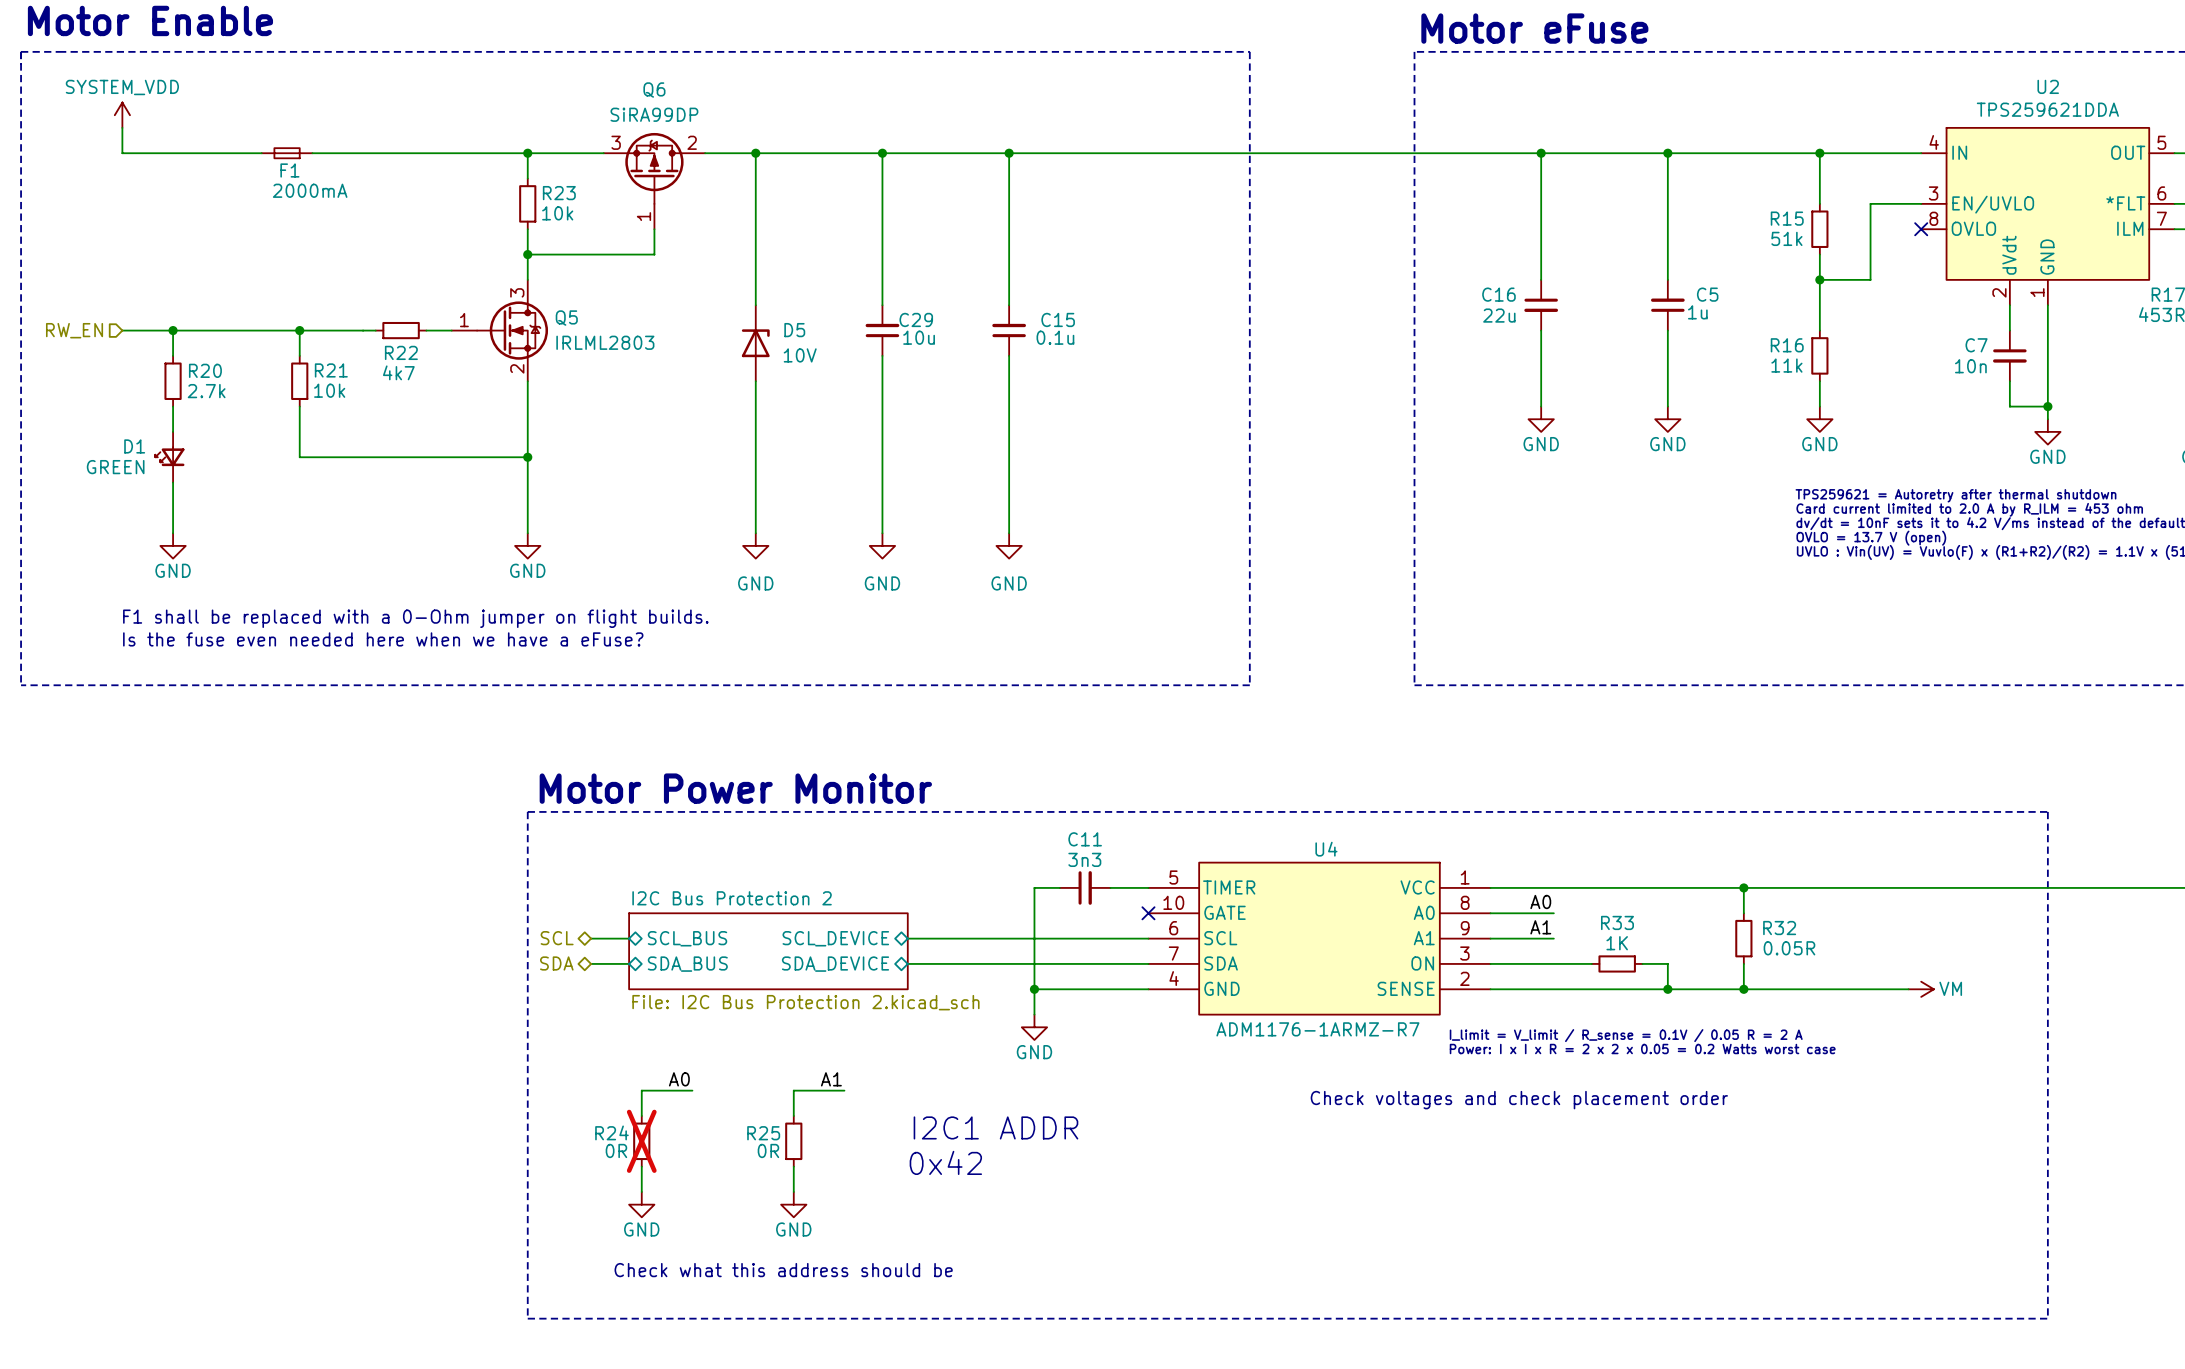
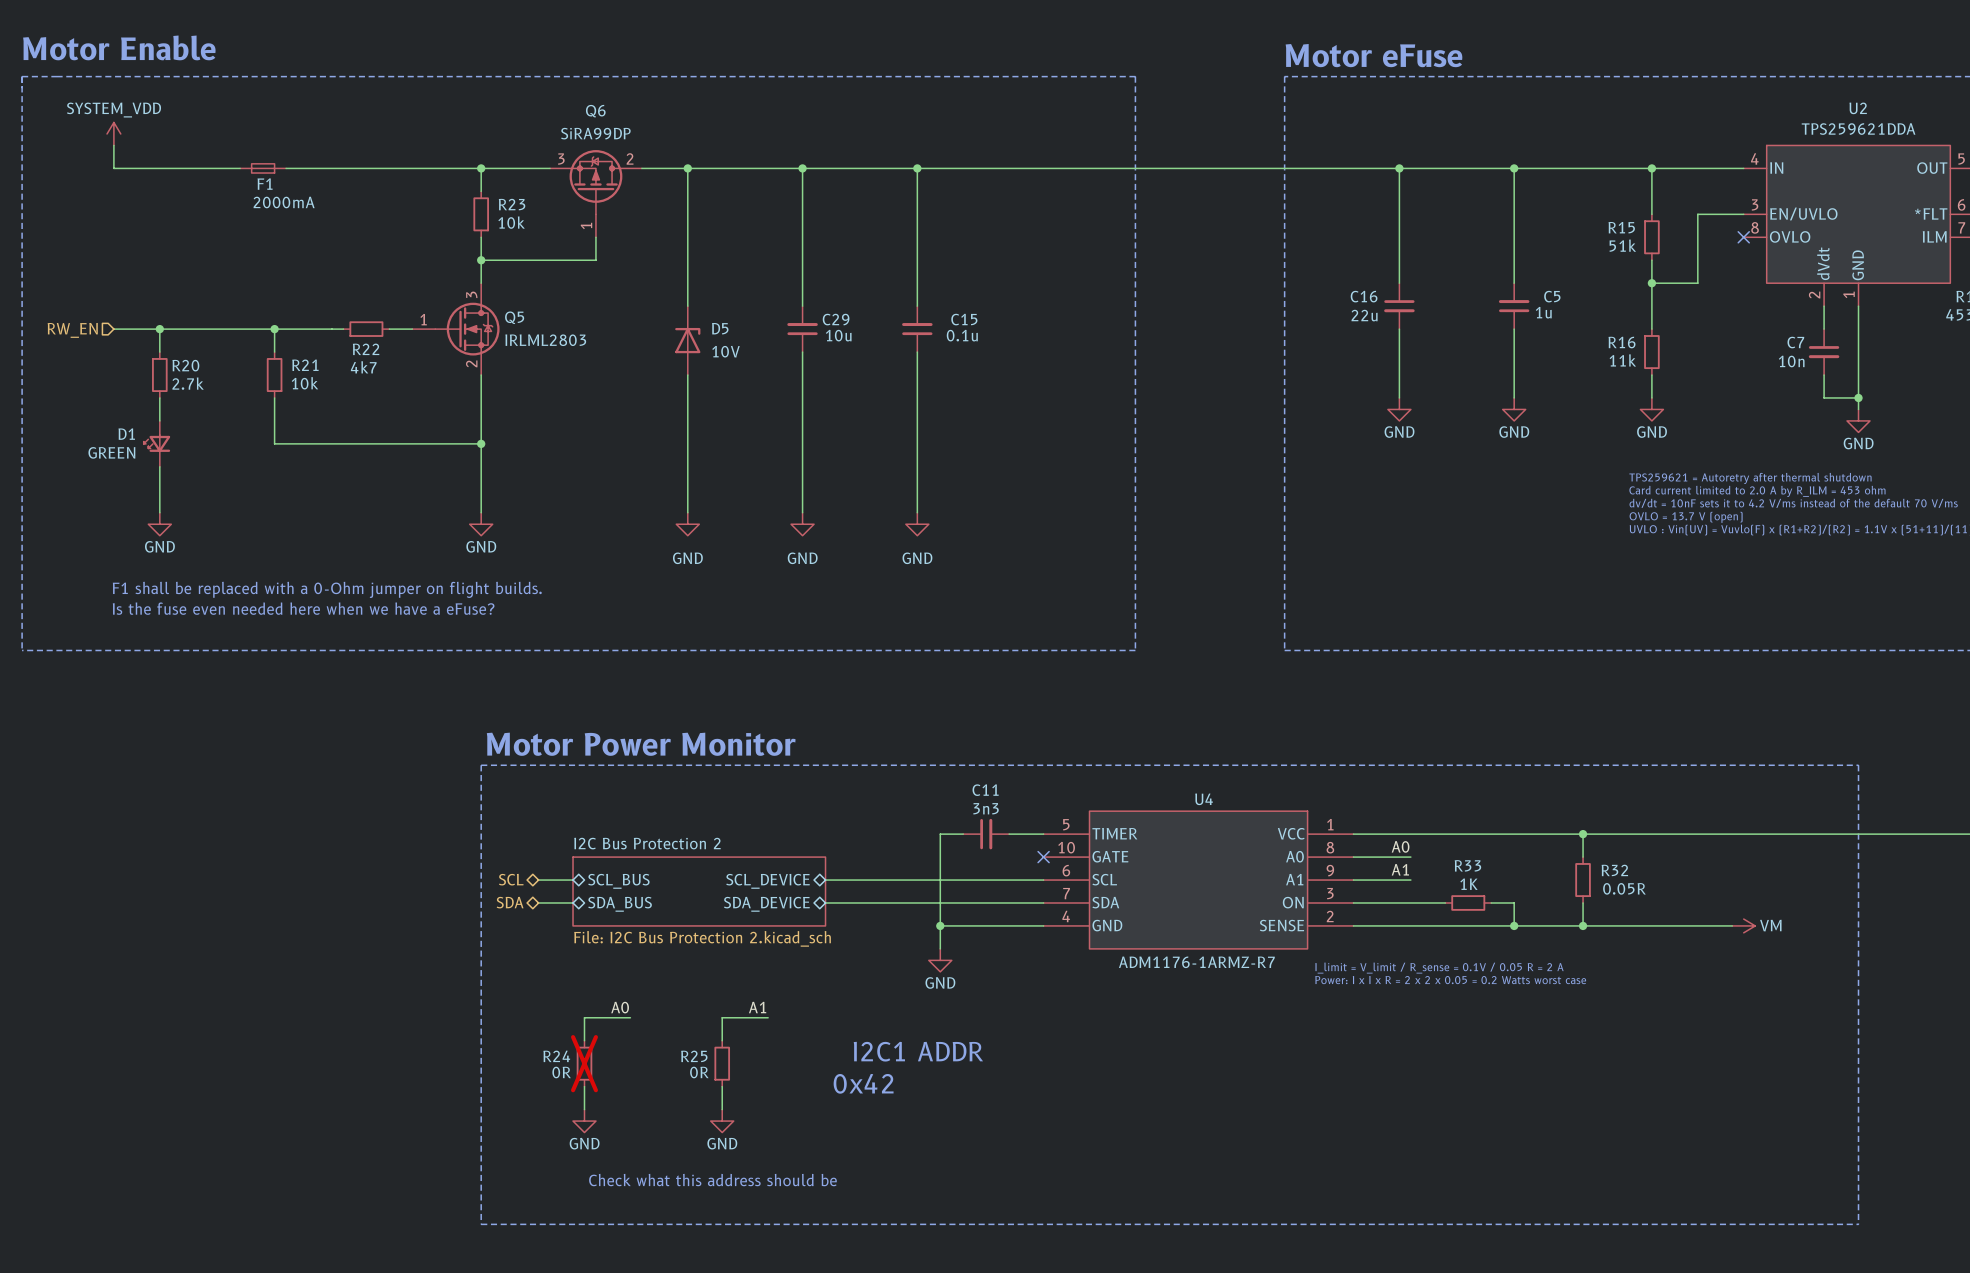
text: Check voltages and check placement order (1519, 1100) -> none

